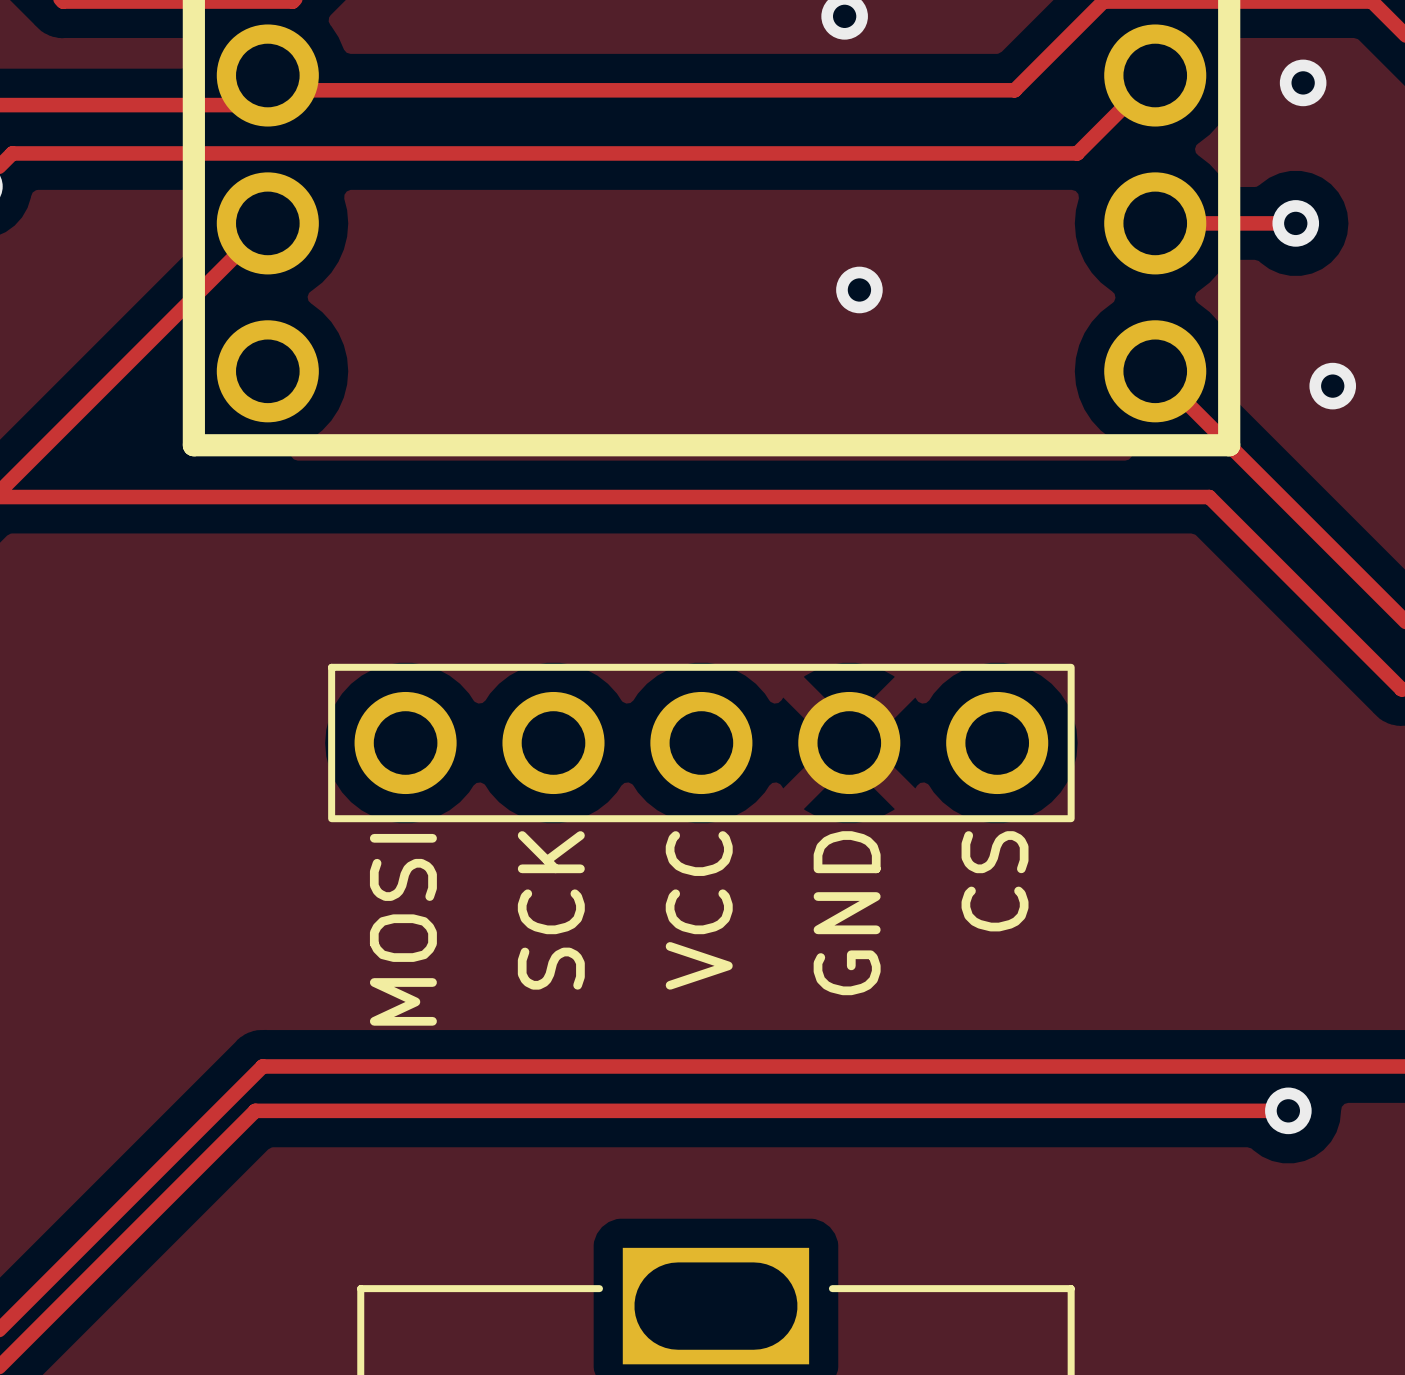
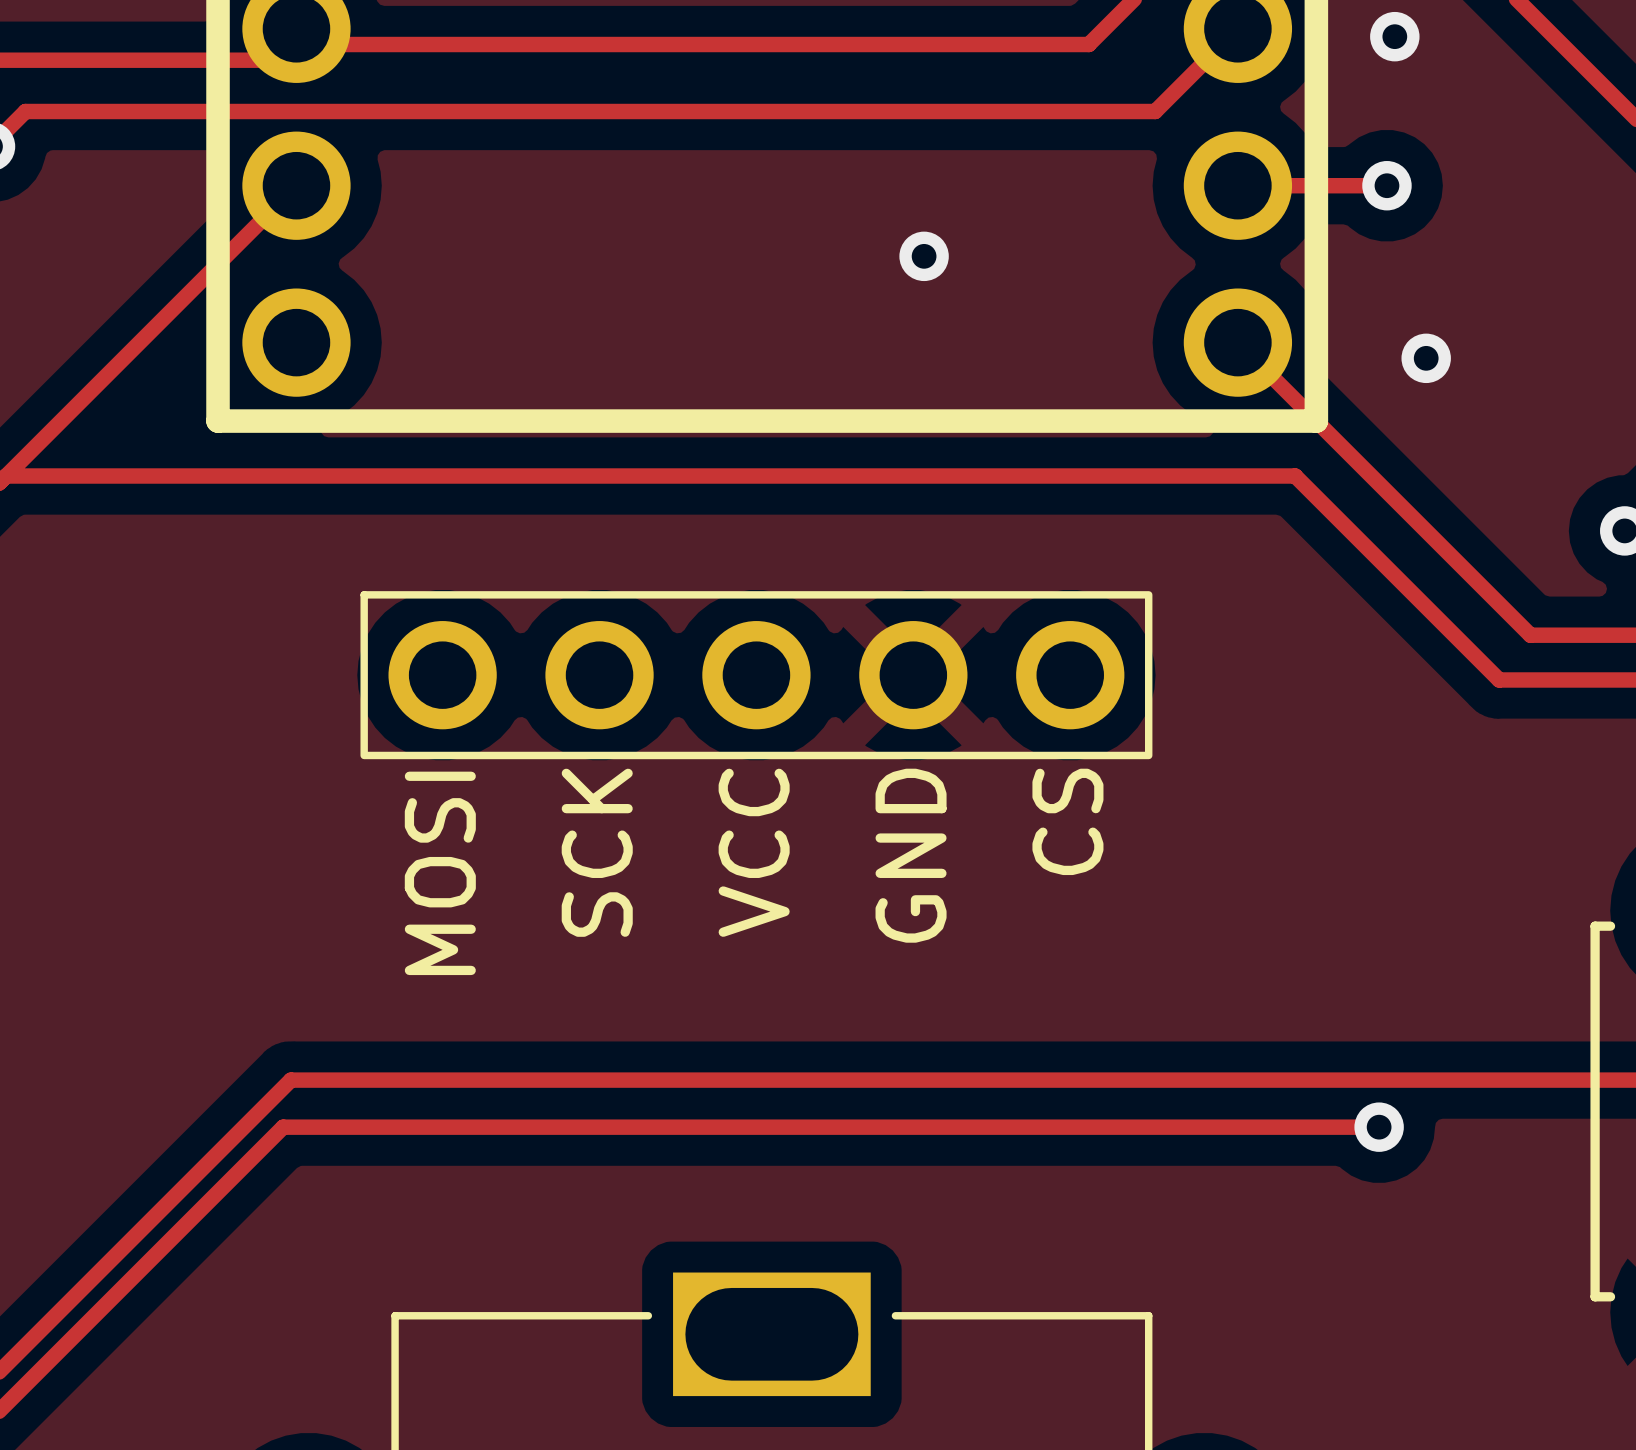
part position: (701, 743) -> (756, 675)

